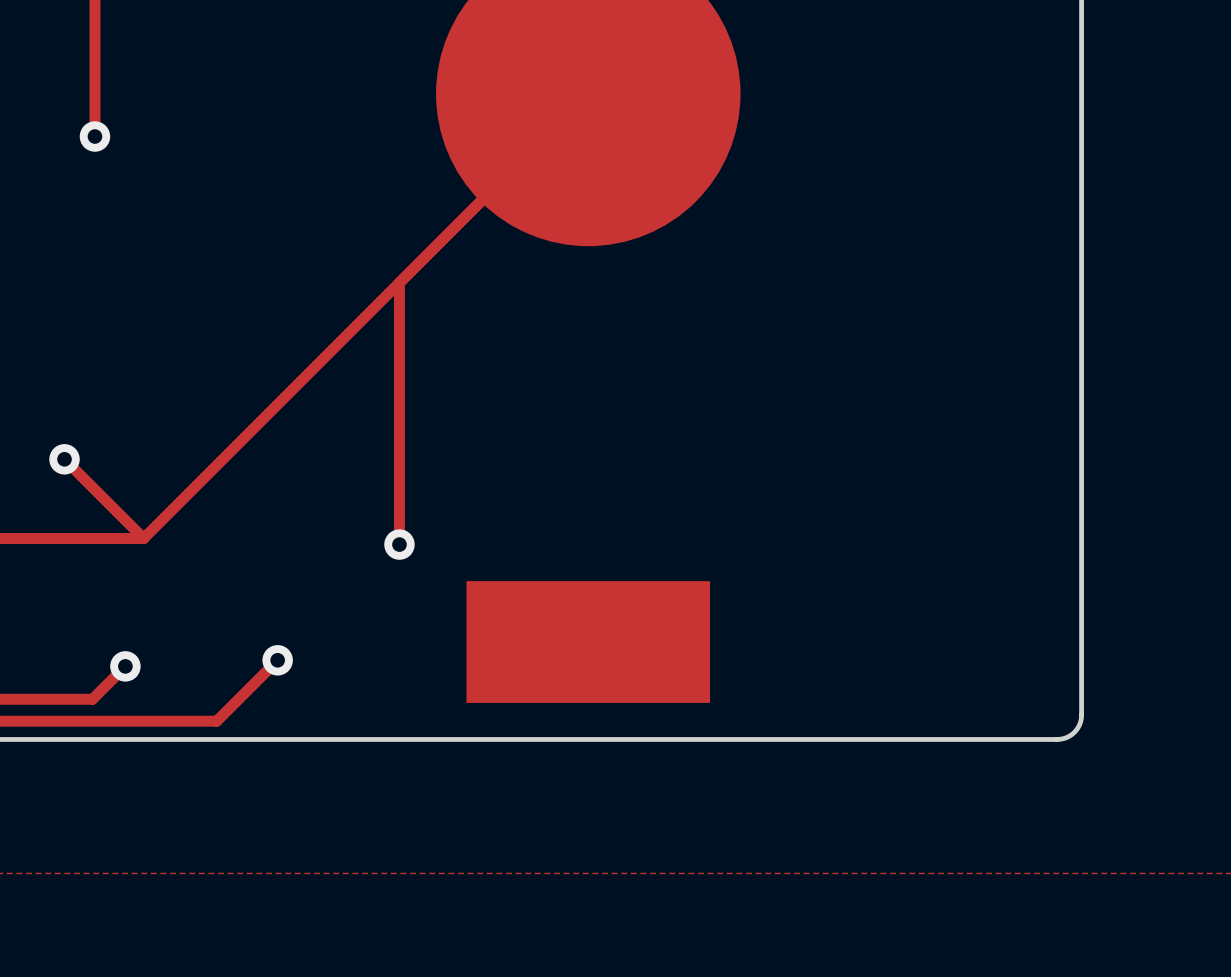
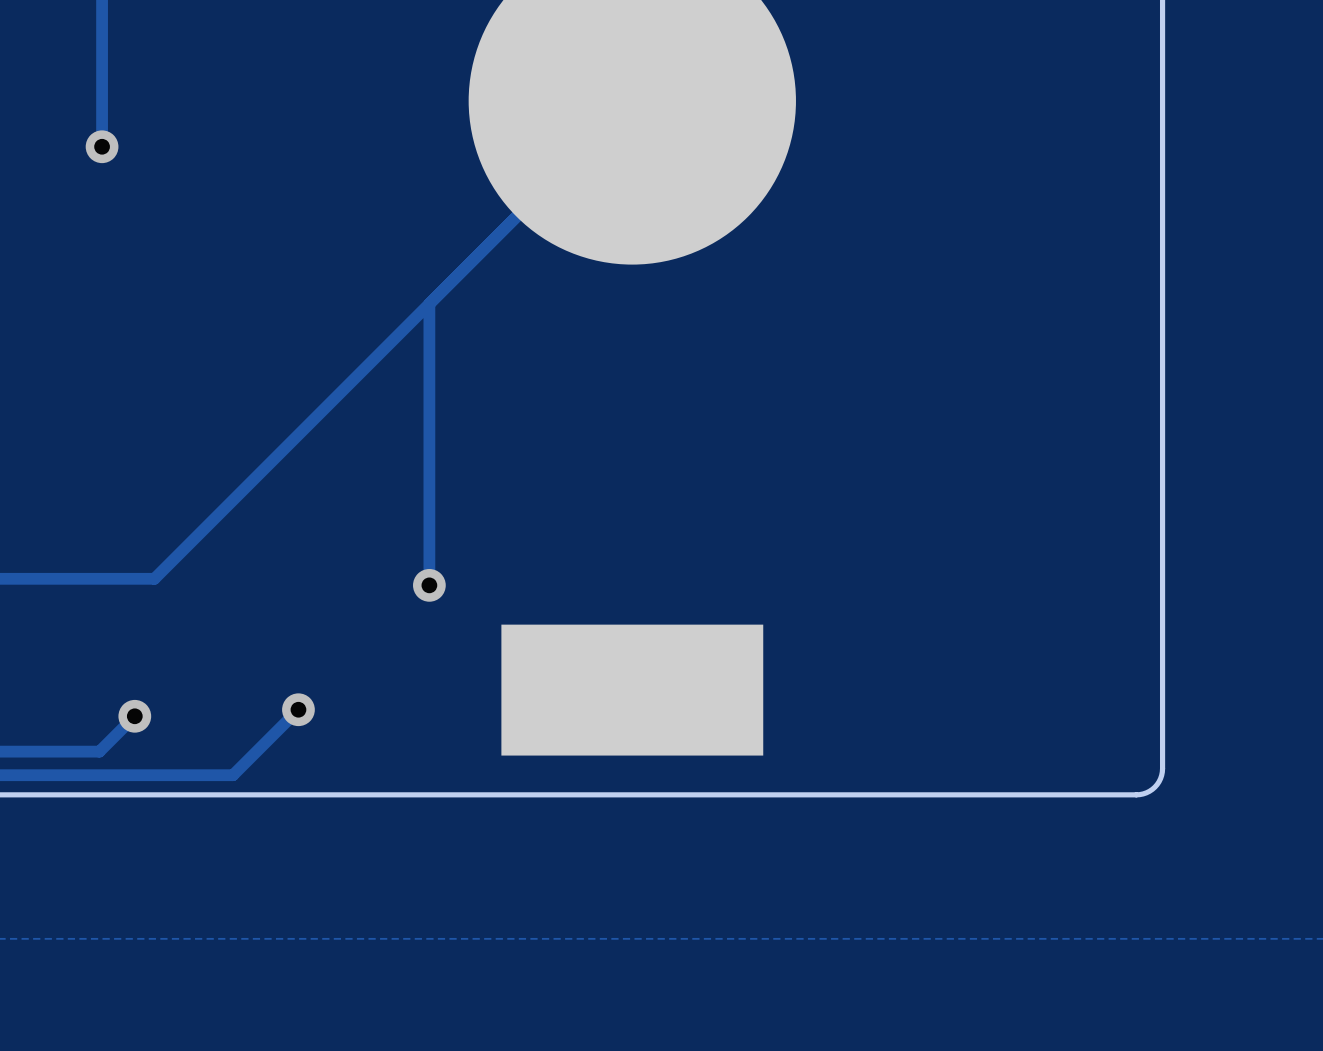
track: (64, 459) (143, 538) -> none
via: (64, 459) -> none

